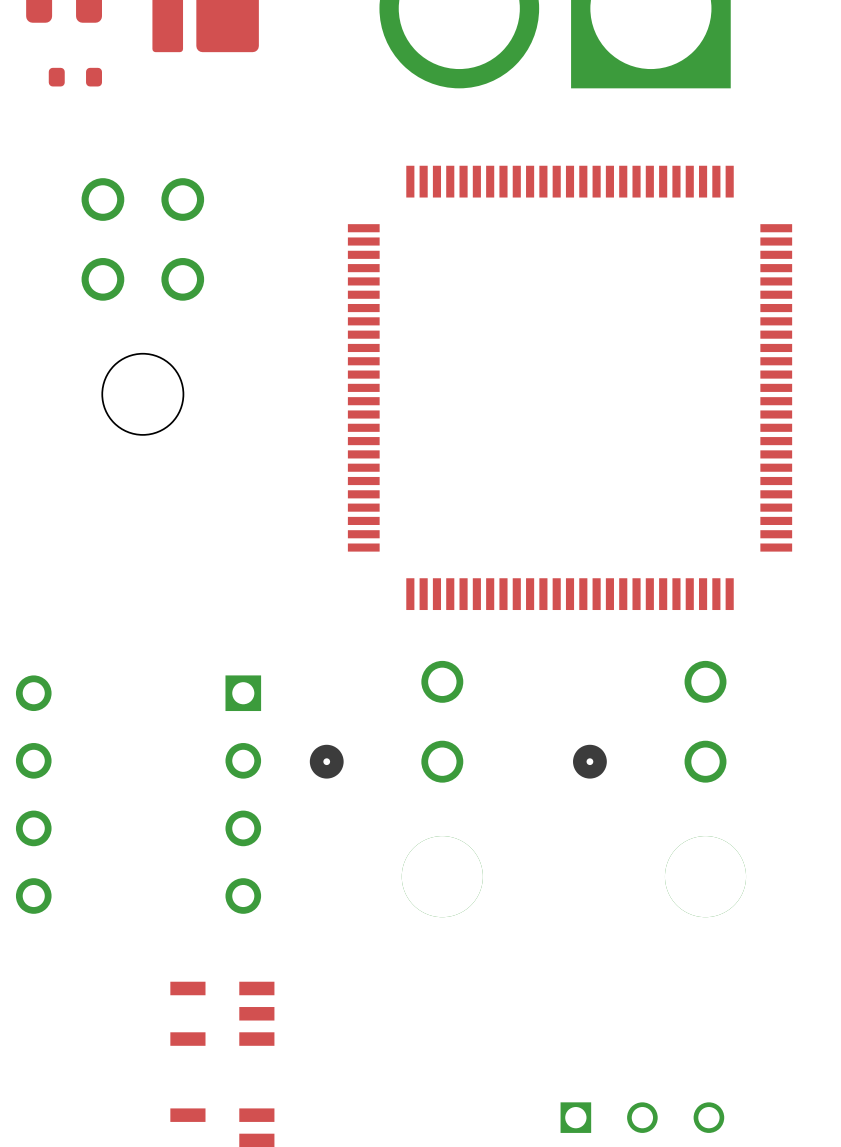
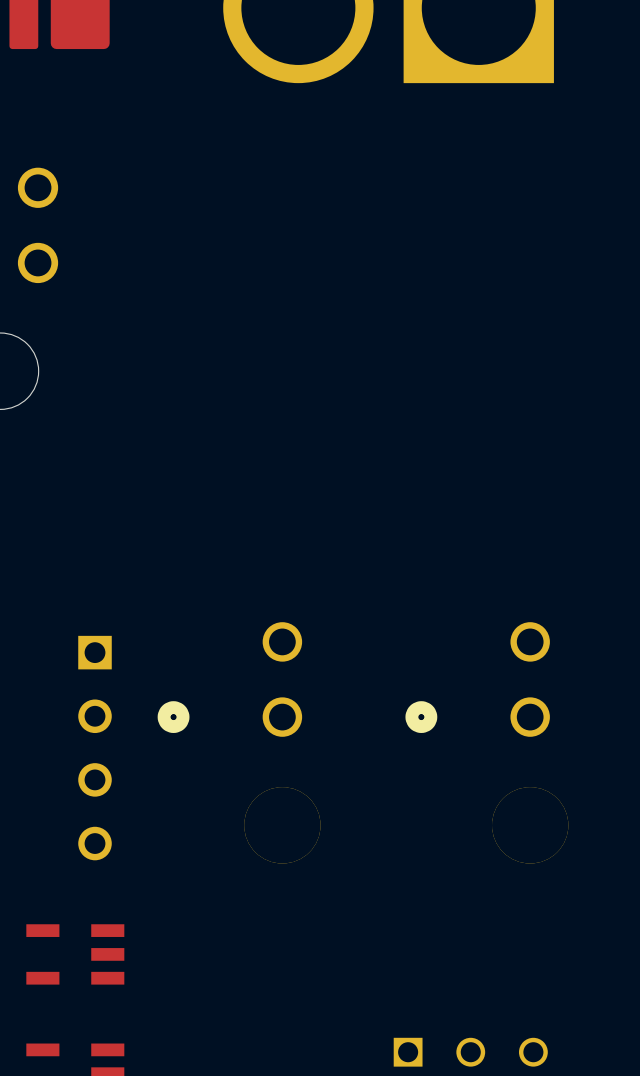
part: (570, 387) -> none

